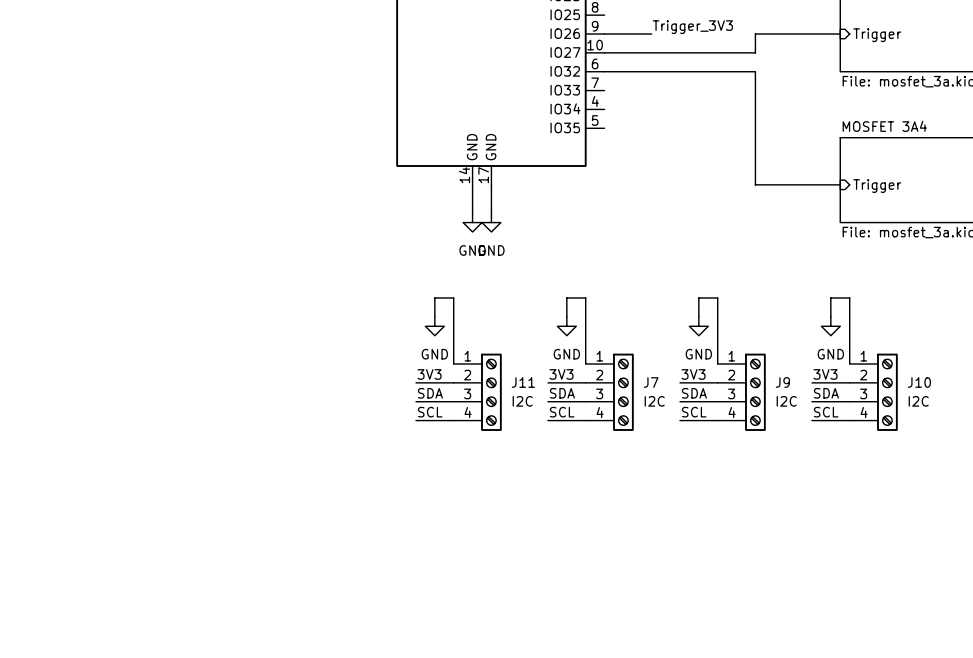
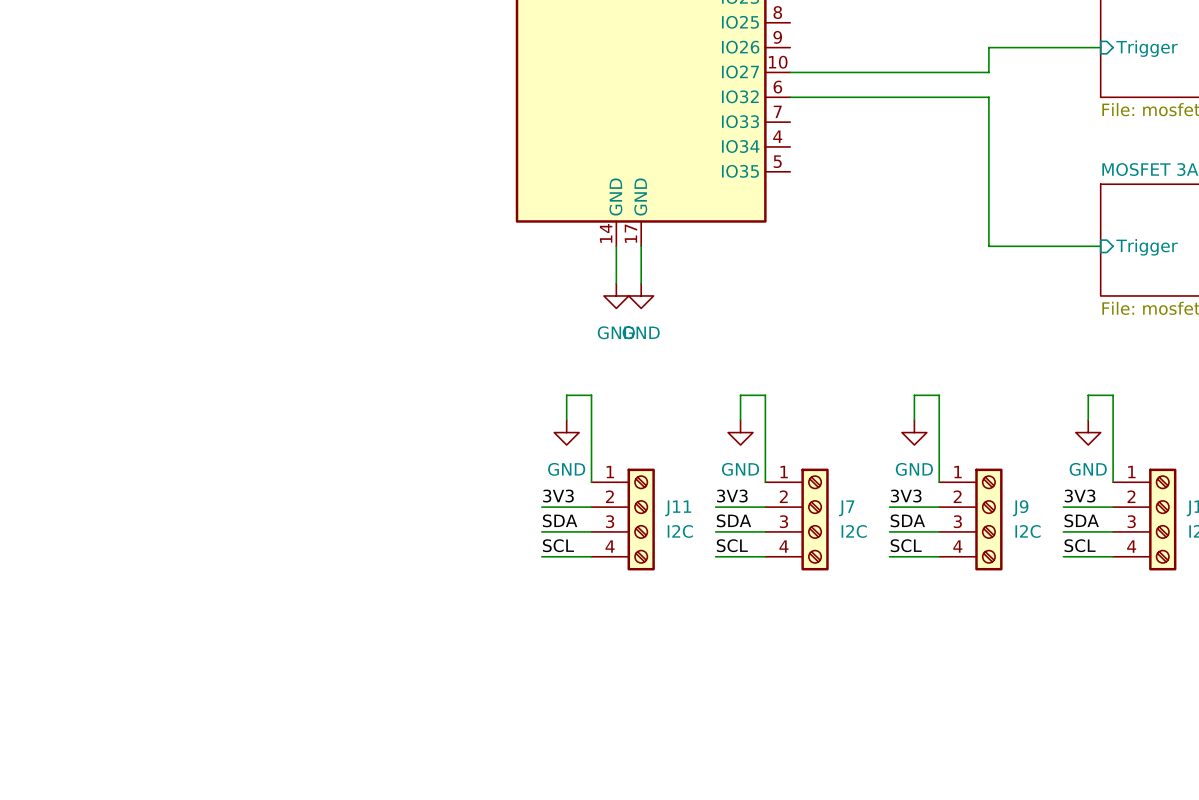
label: Trigger_3V3 (692, 27) -> none
wire: (604, 34) (651, 34) -> none

